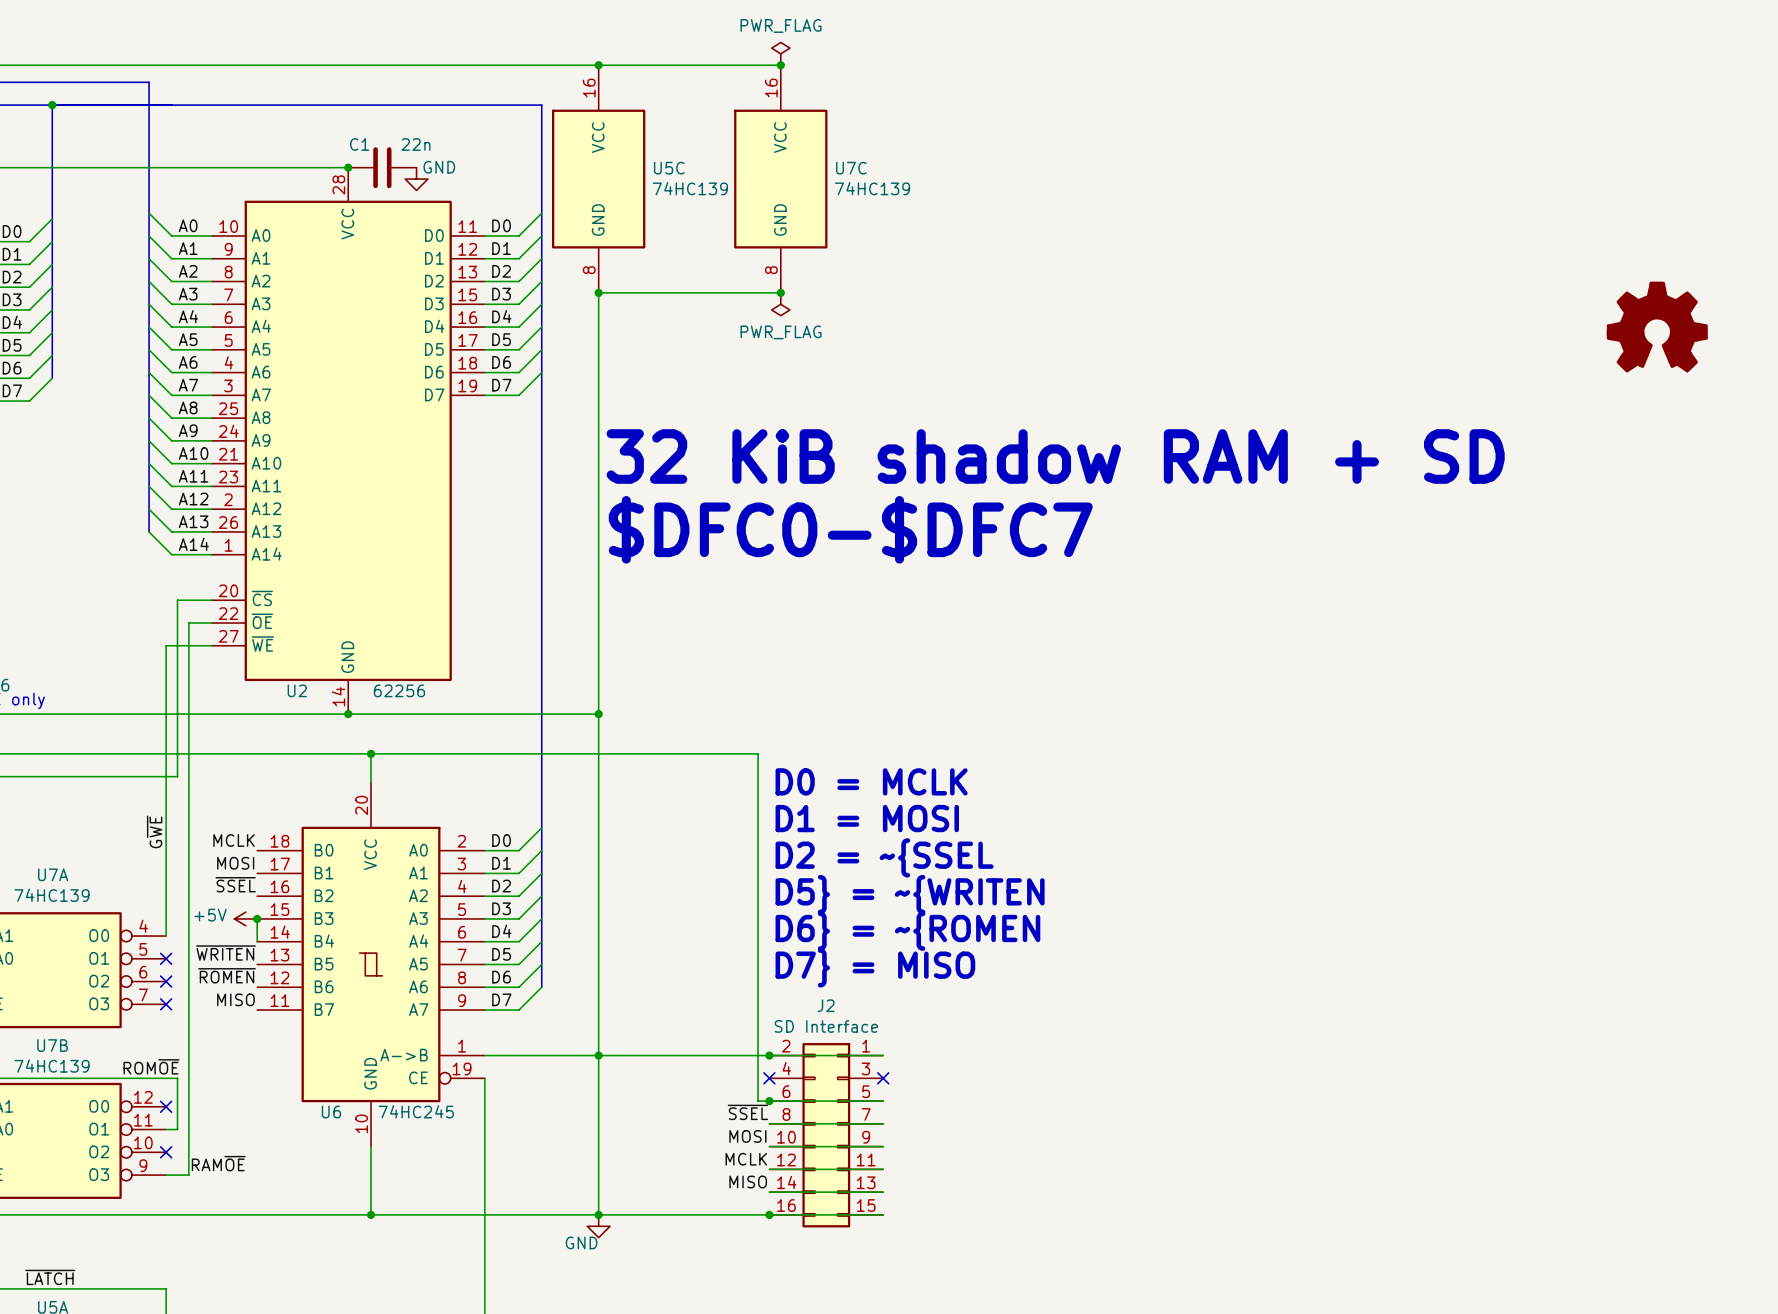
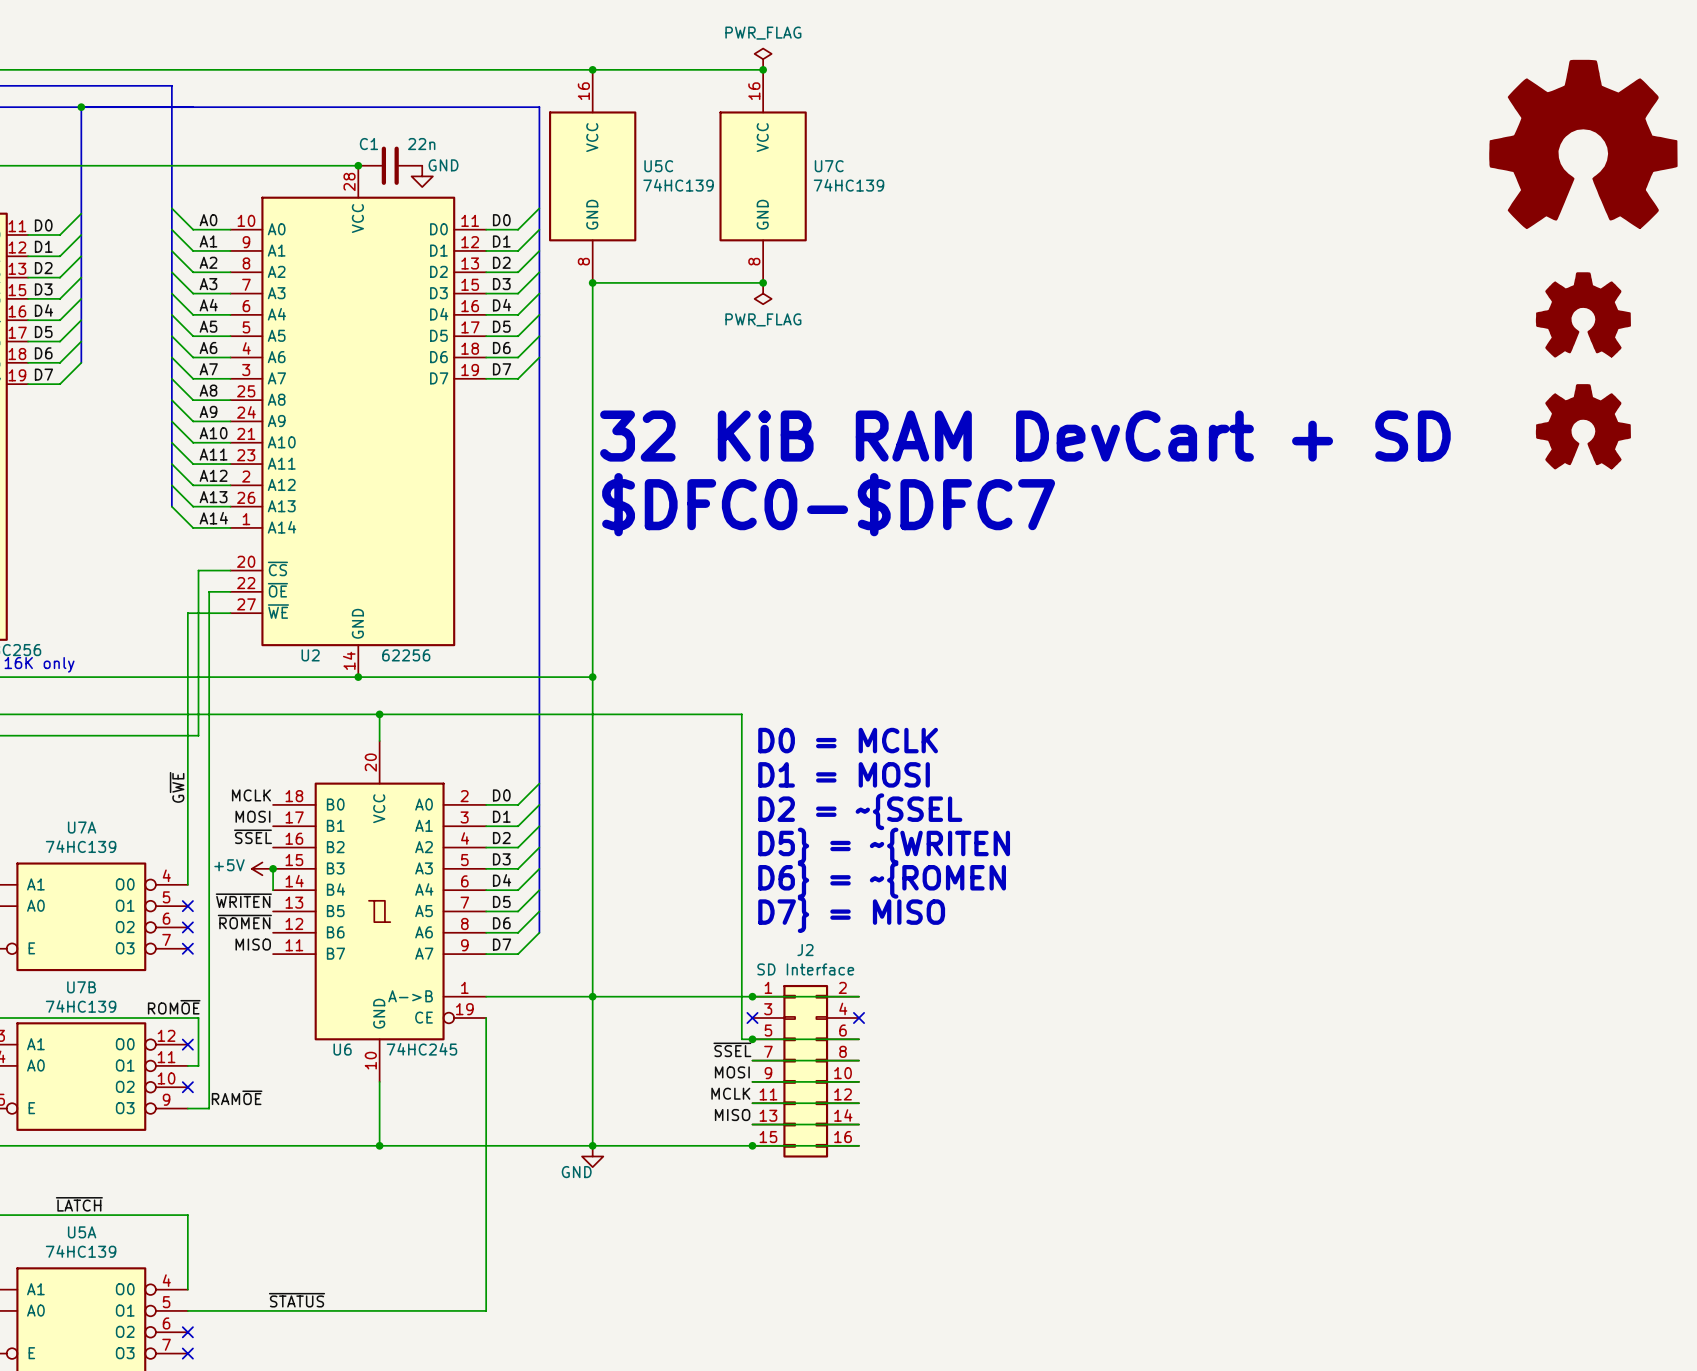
part: none -> (1583, 144)
part: none -> (1583, 426)
text: 32 KiB shadow RAM + SD (1055, 456) -> 32 KiB RAM DevCart + SD (1025, 436)
J2 flip: as is (826, 1135) -> left-right (805, 1071)

